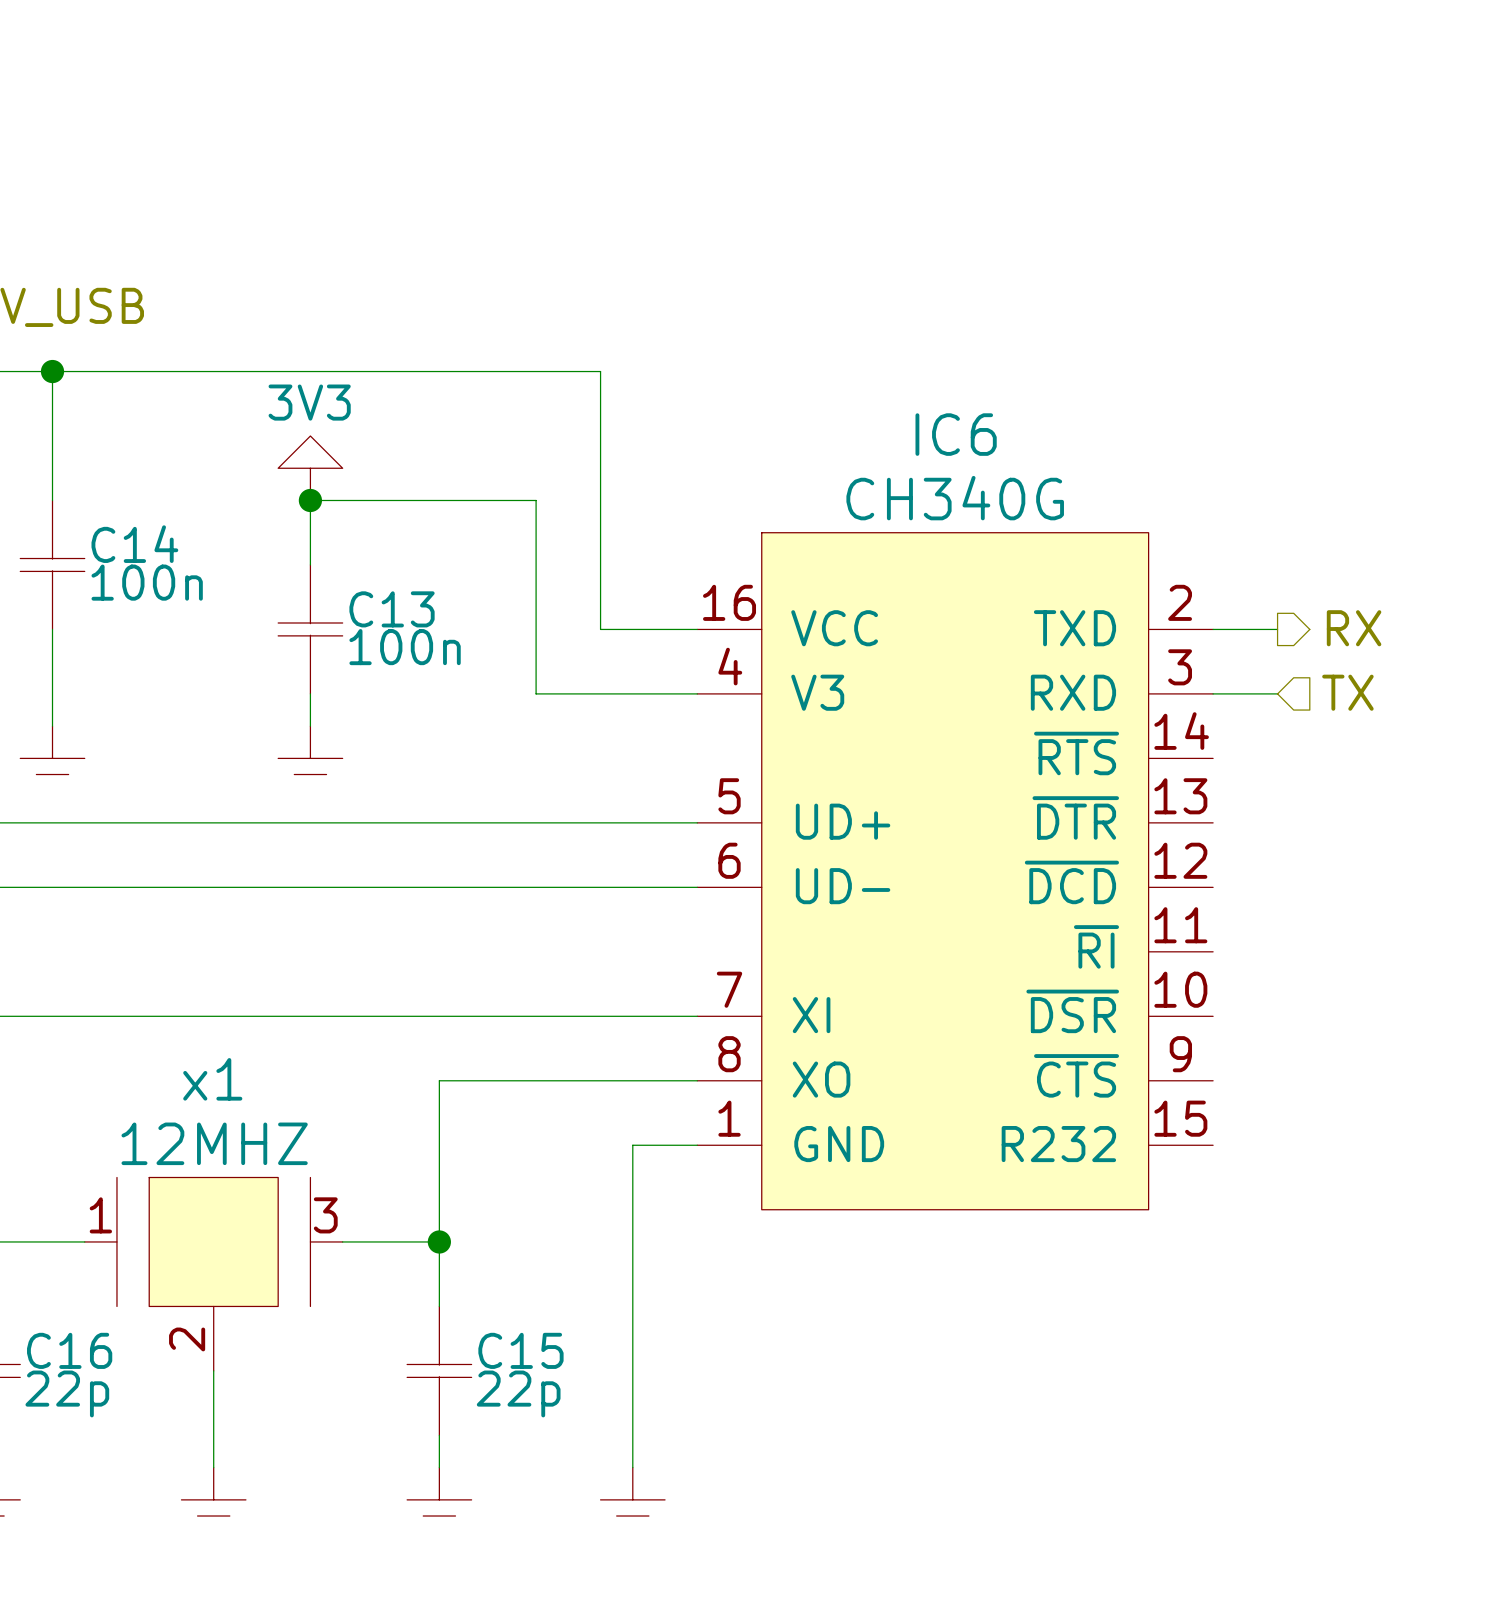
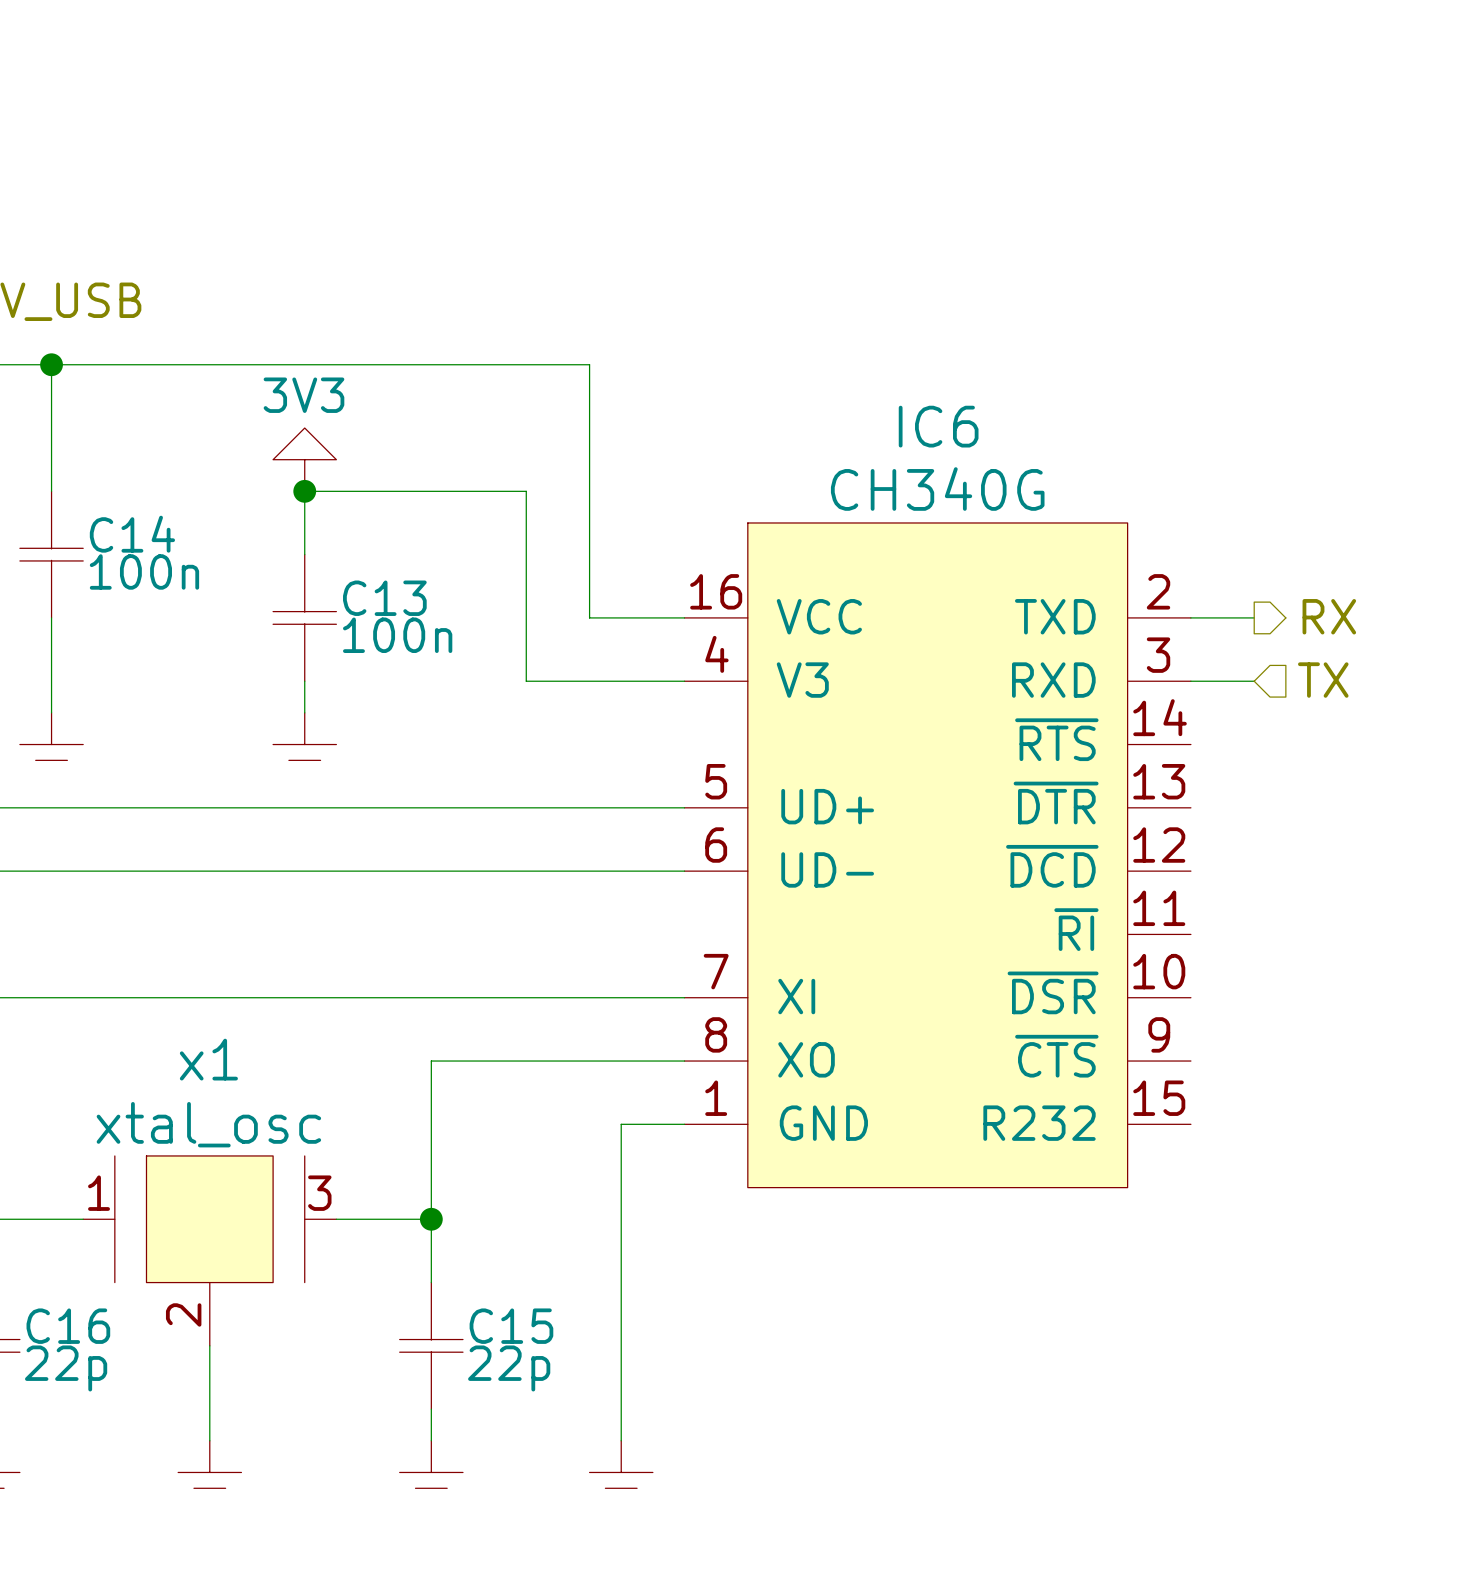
x1 value: 12MHZ (214, 1143) -> xtal_osc (208, 1124)

